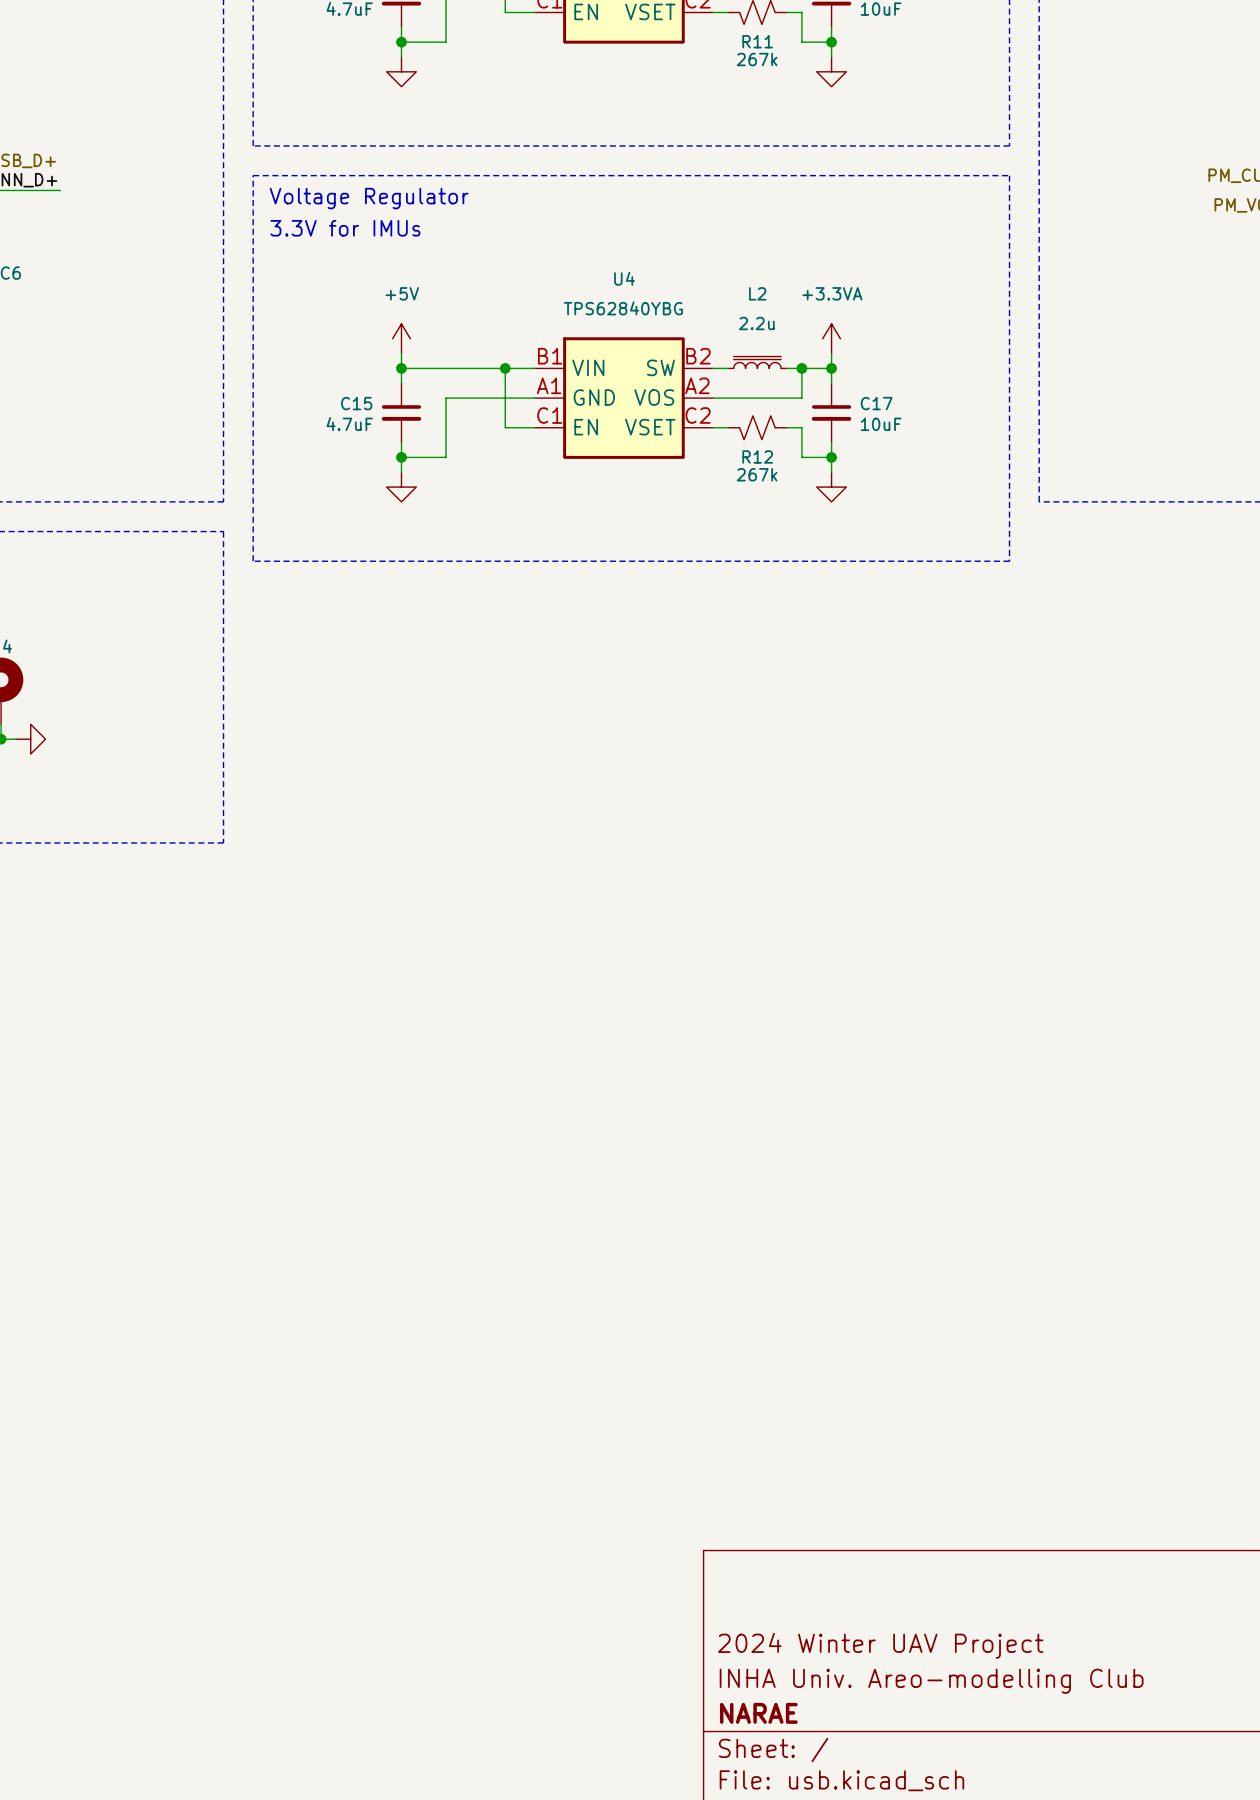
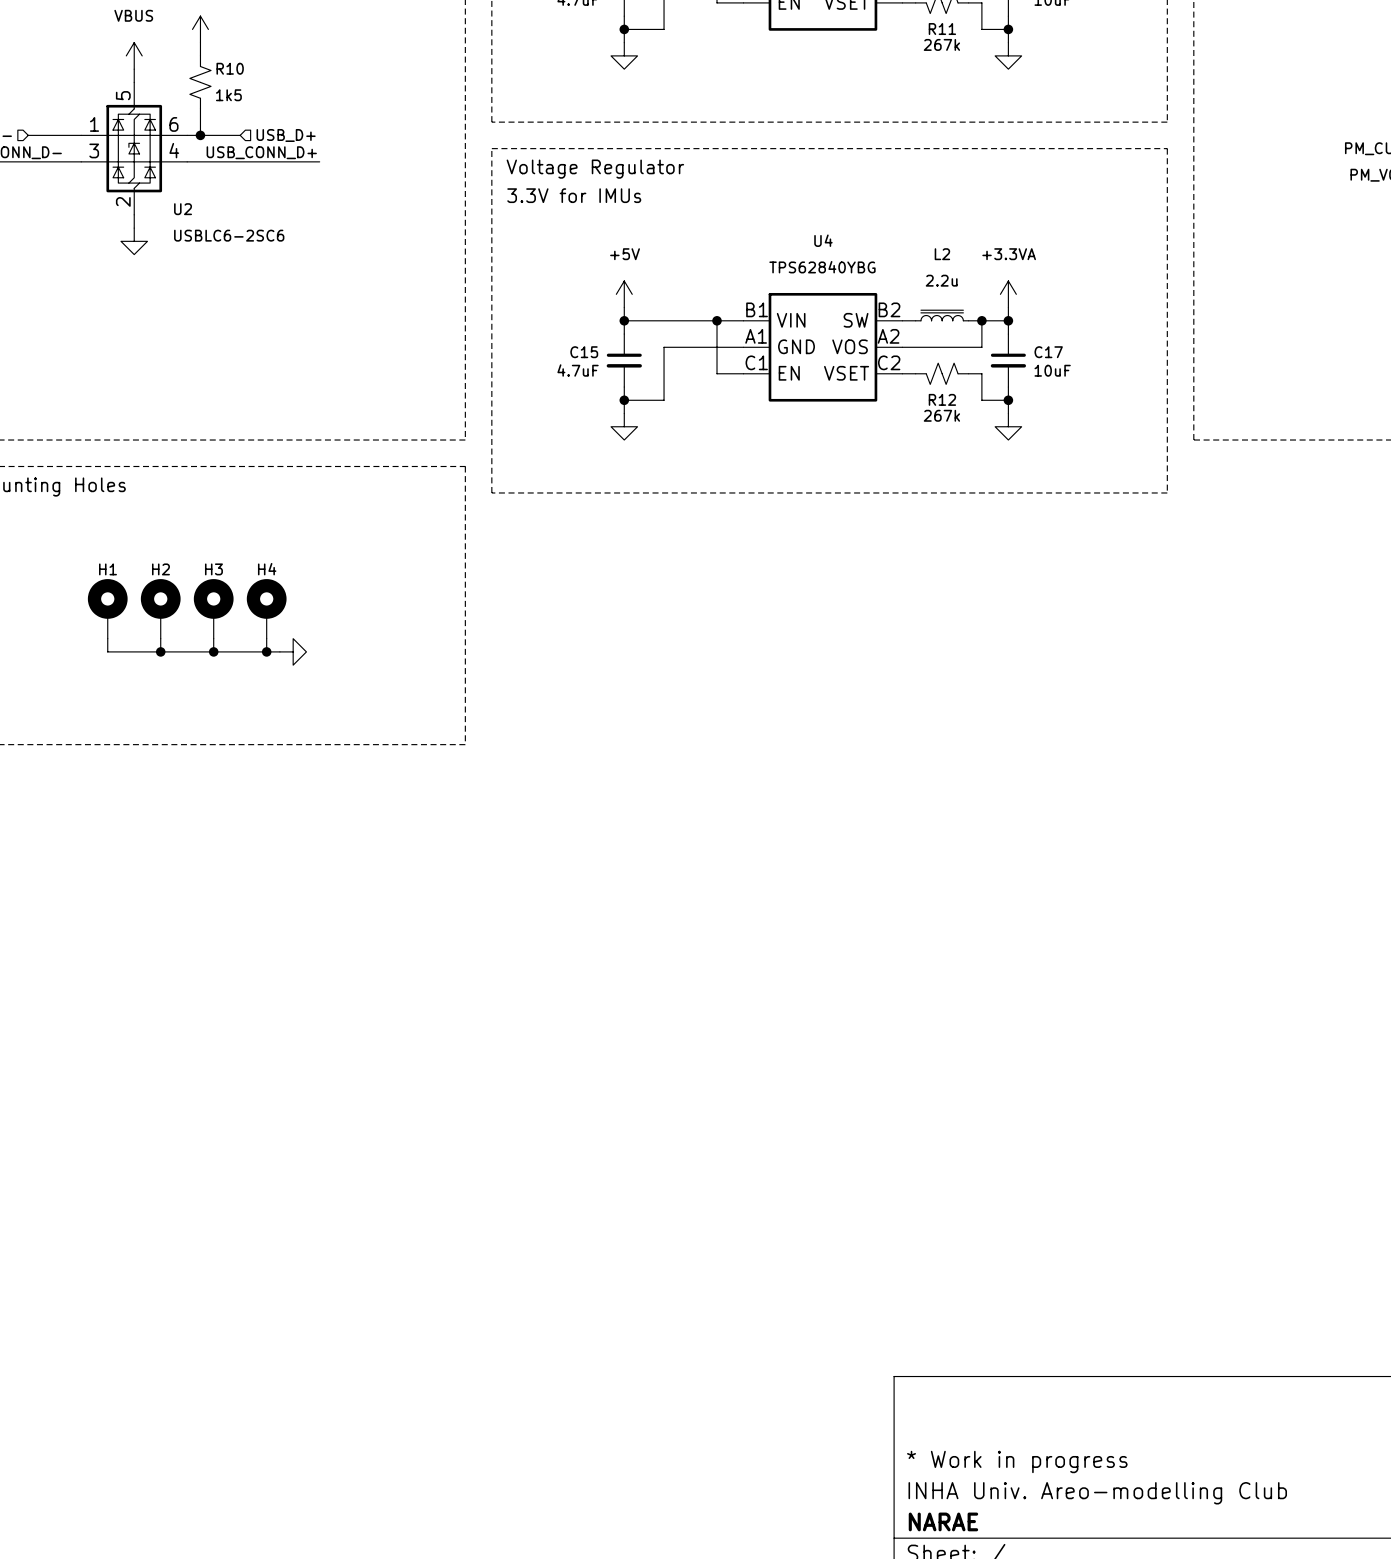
title block: 2024 Winter UAV Project (880, 1645) -> * Work in progress (1017, 1461)

